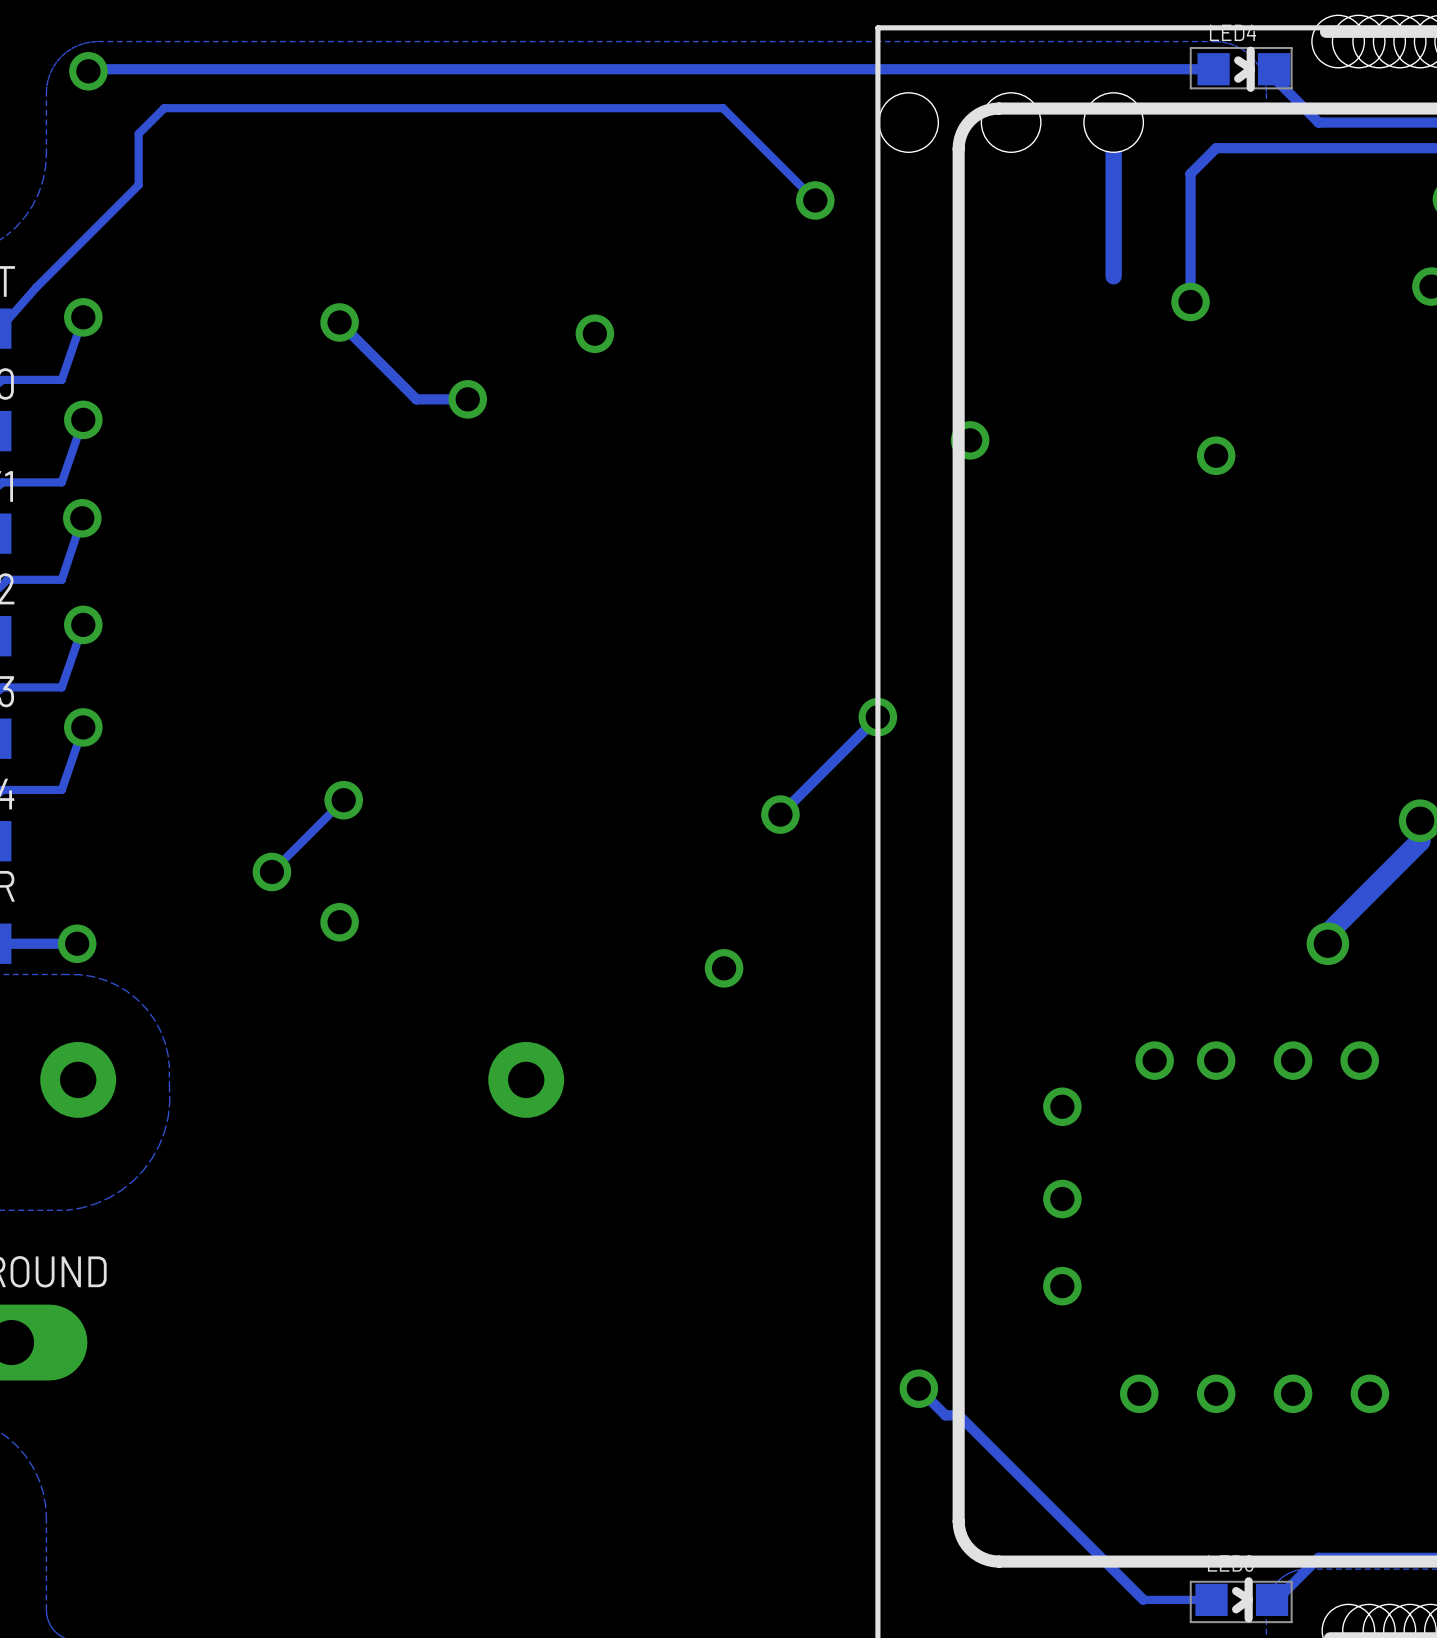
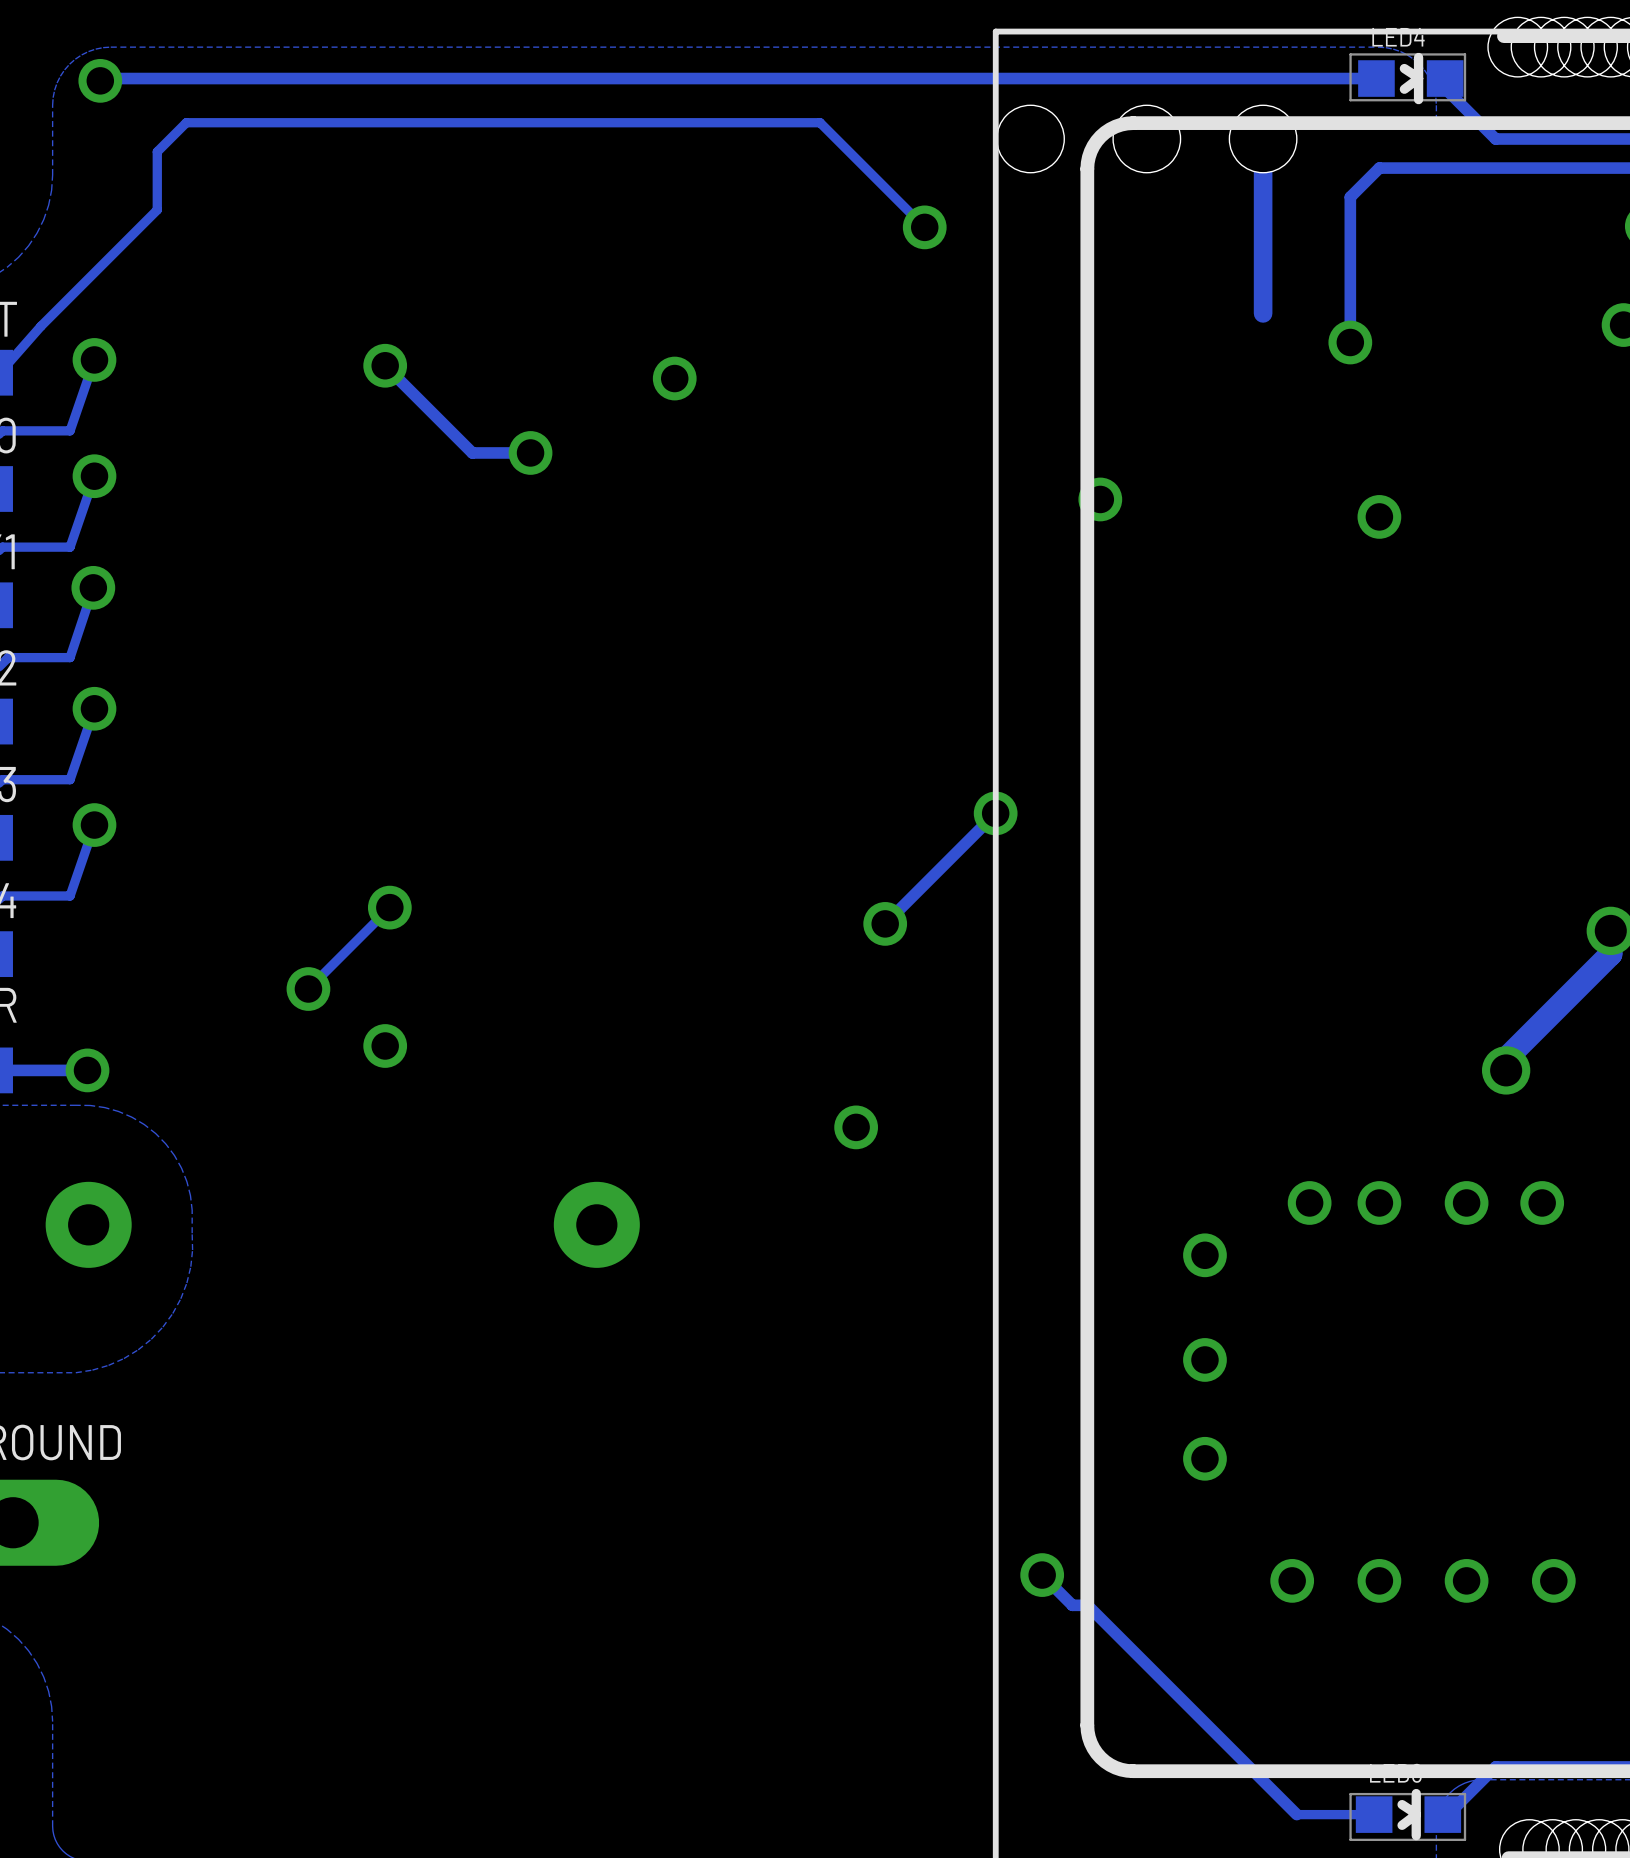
via position: (724, 968) -> (856, 1127)

